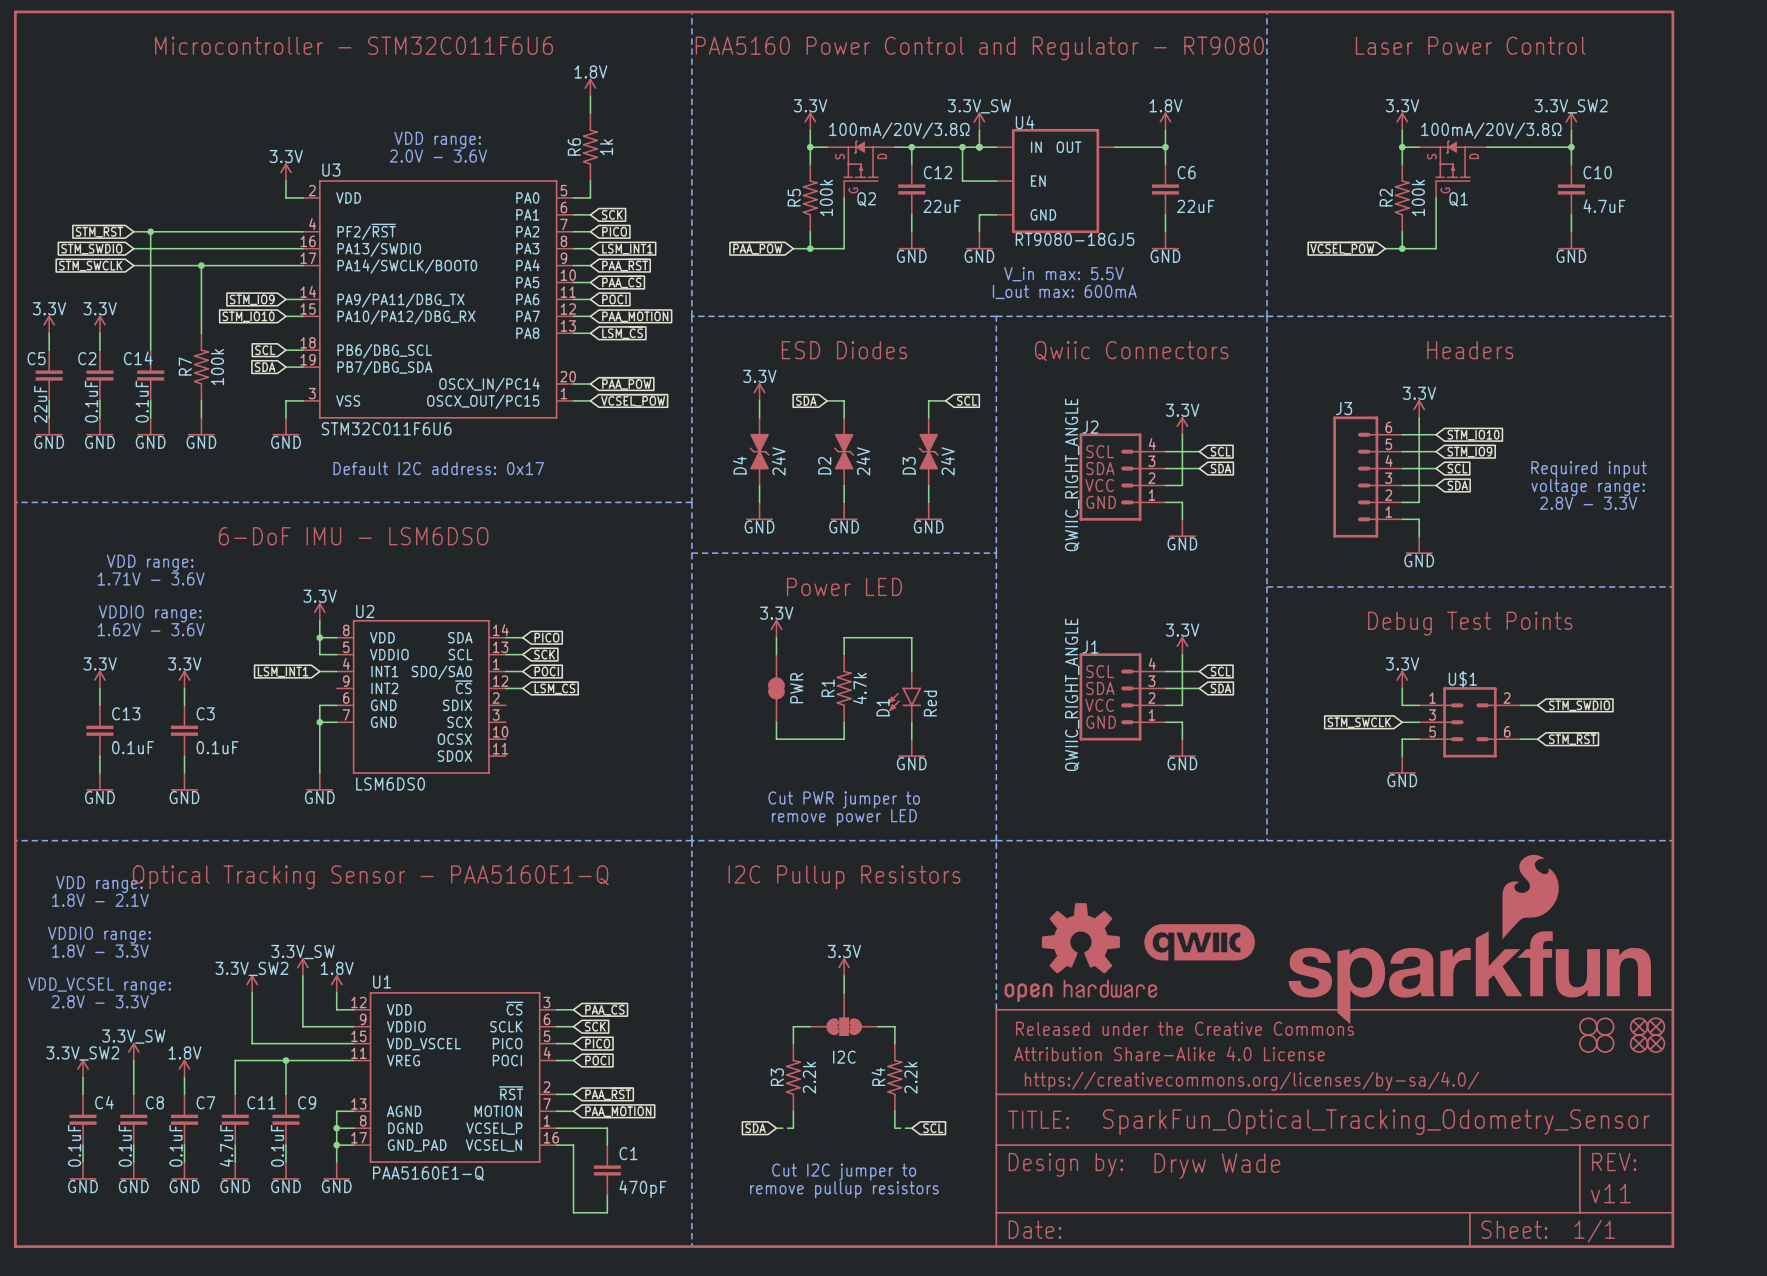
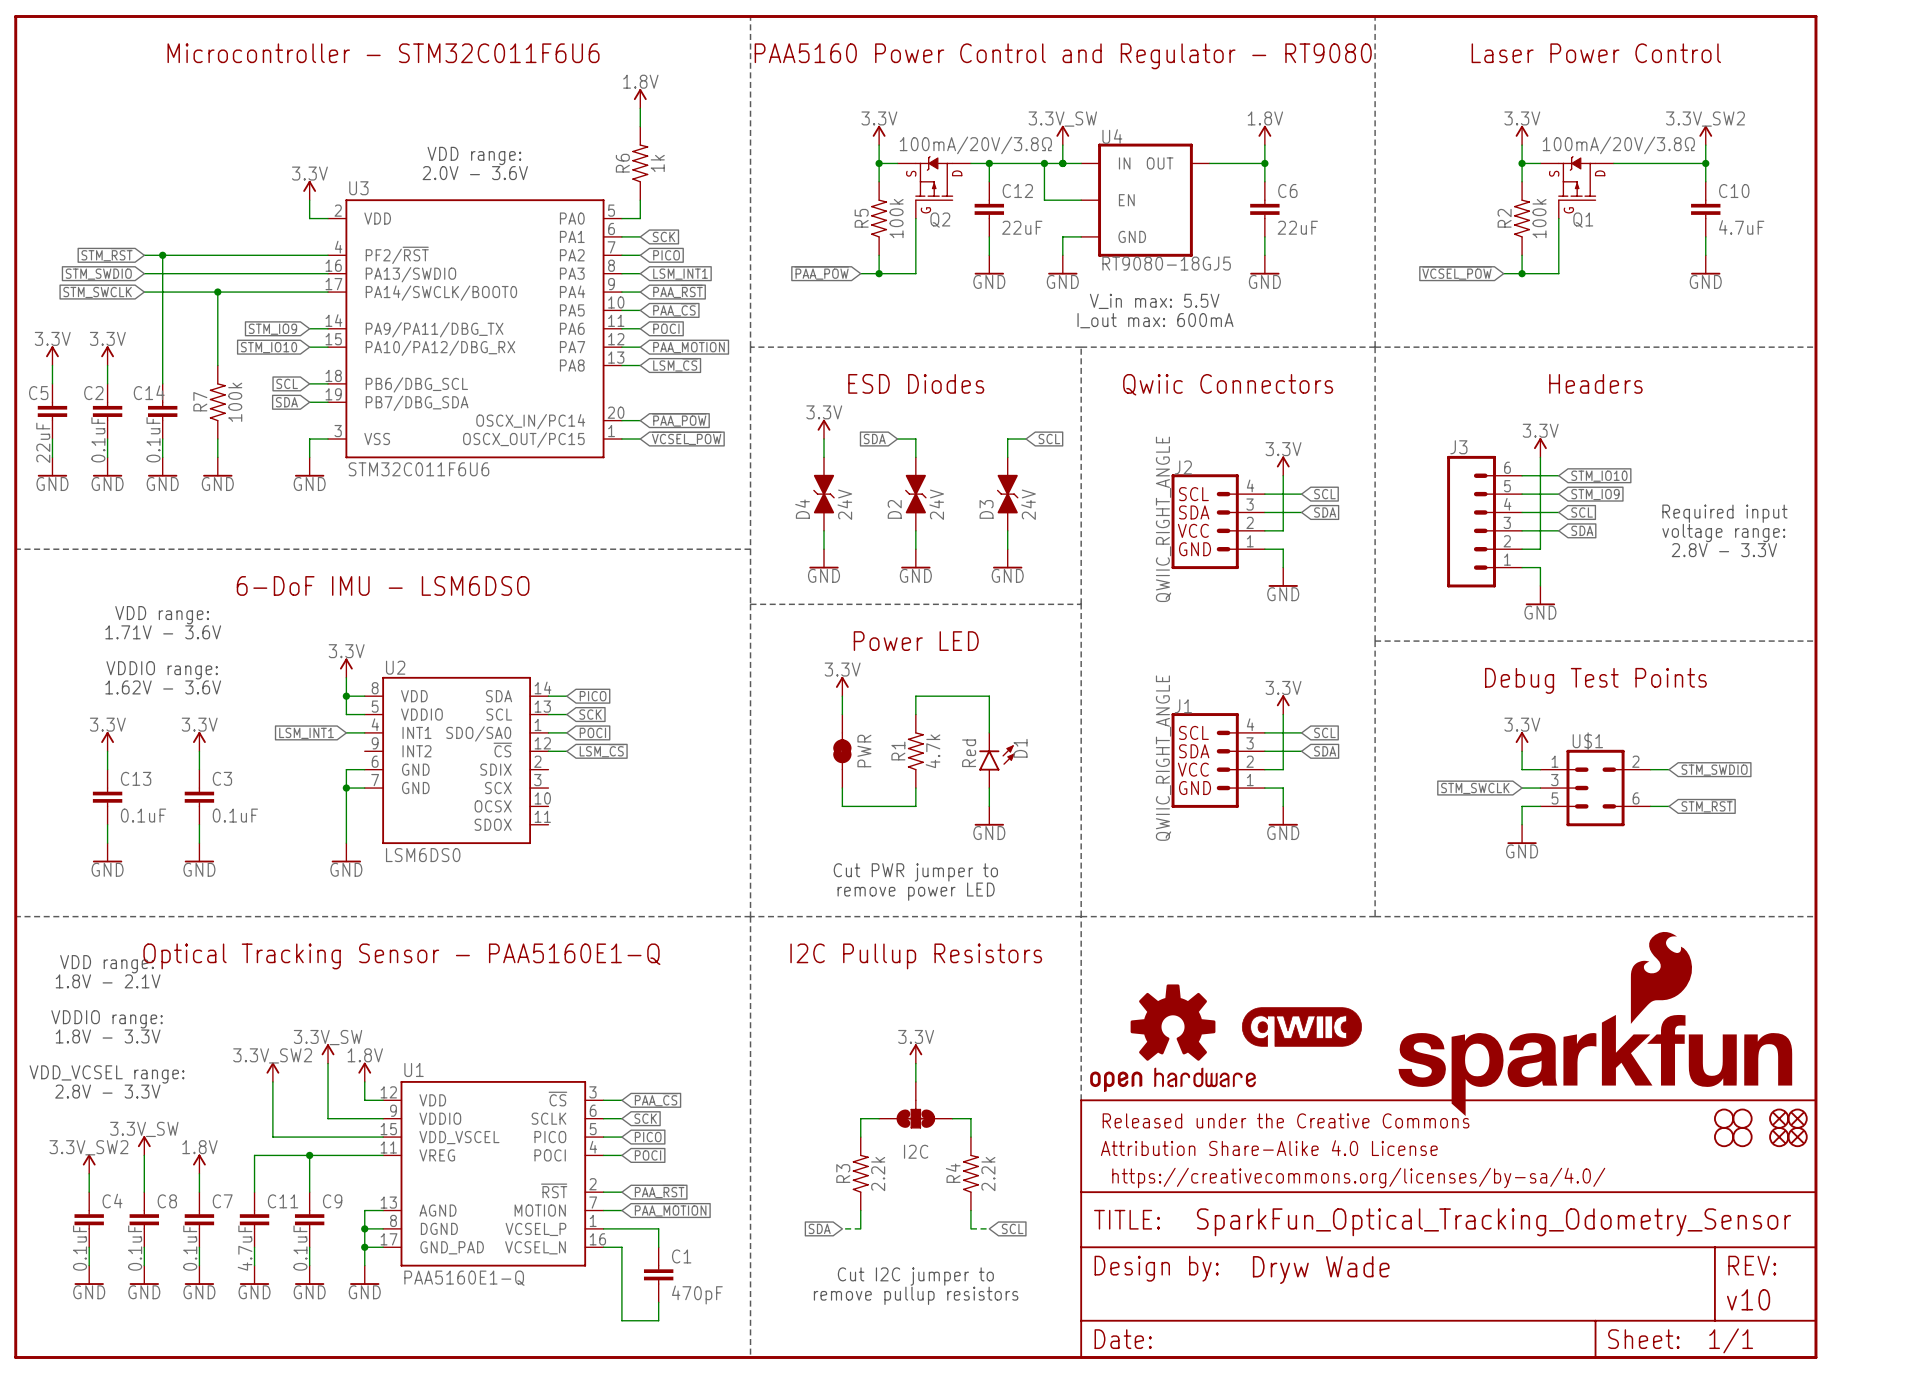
text: Default I2C address: 0x17 (438, 468) -> none
D1 rotation: 0° (904, 699) -> 180° (996, 757)
part text: v11 (1610, 1193) -> v10 (1748, 1299)

